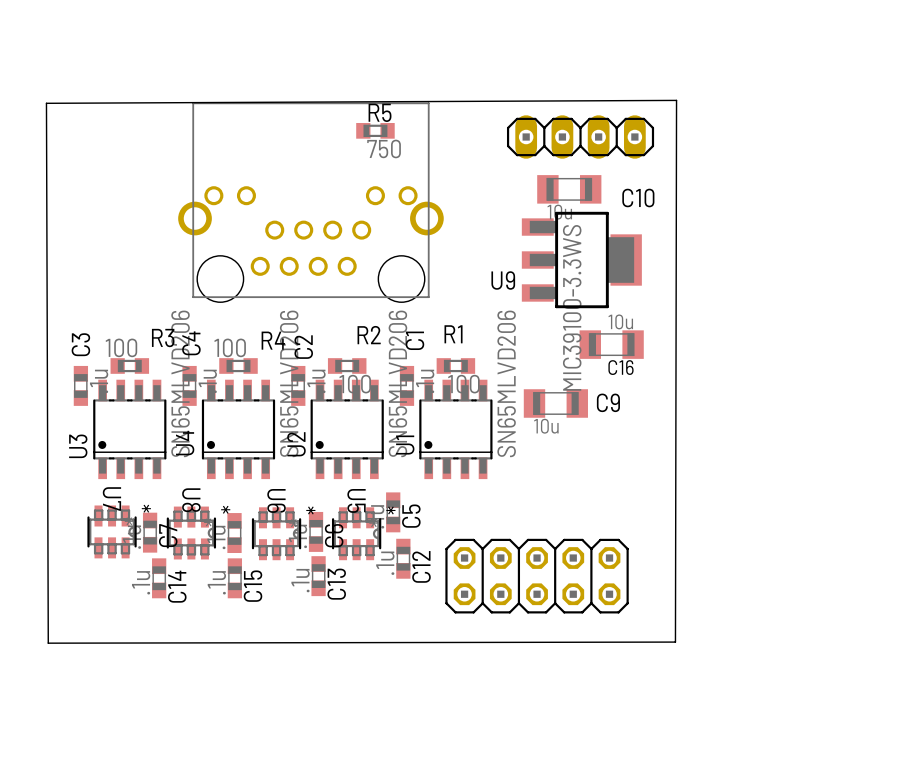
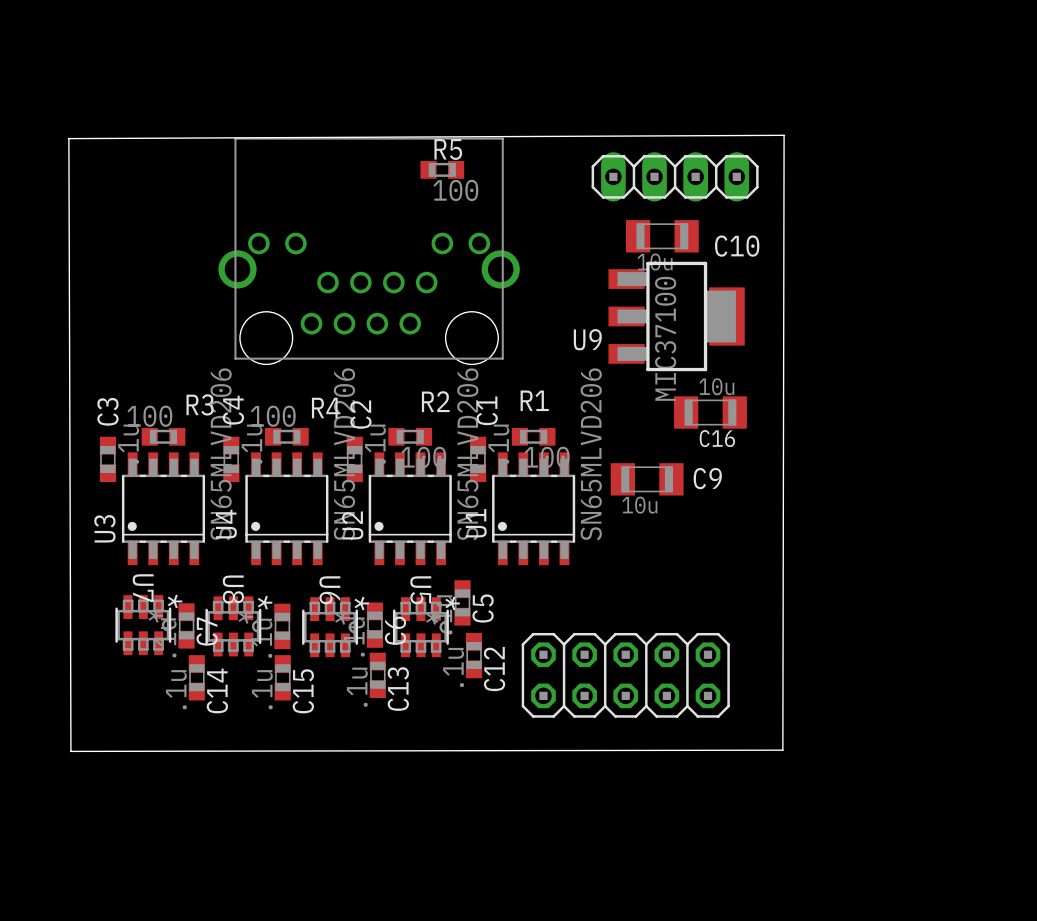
R5 value: 750 (384, 148) -> 100 (455, 190)
U9 value: MIC39100-3.3WS (572, 307) -> MIC37100 (665, 338)

